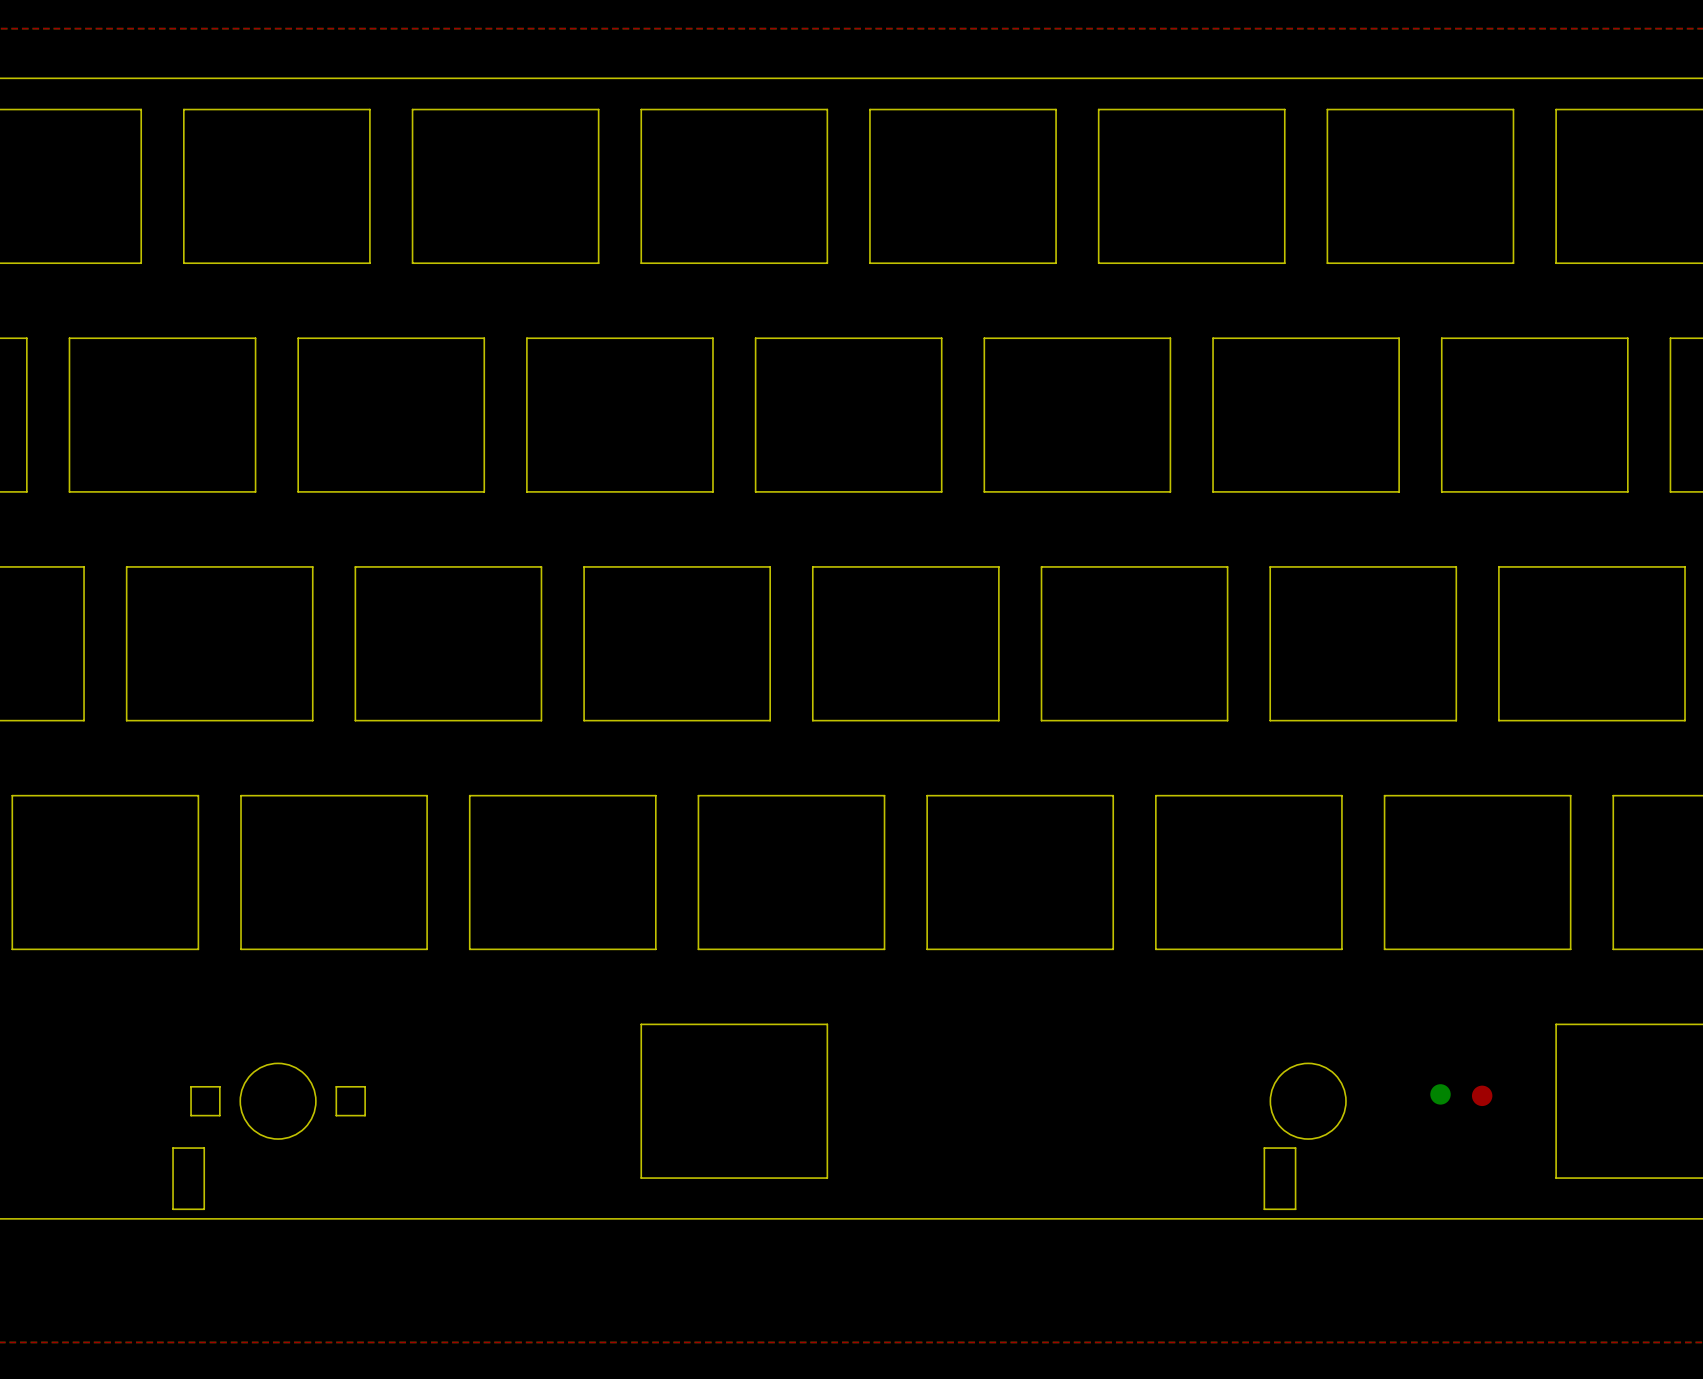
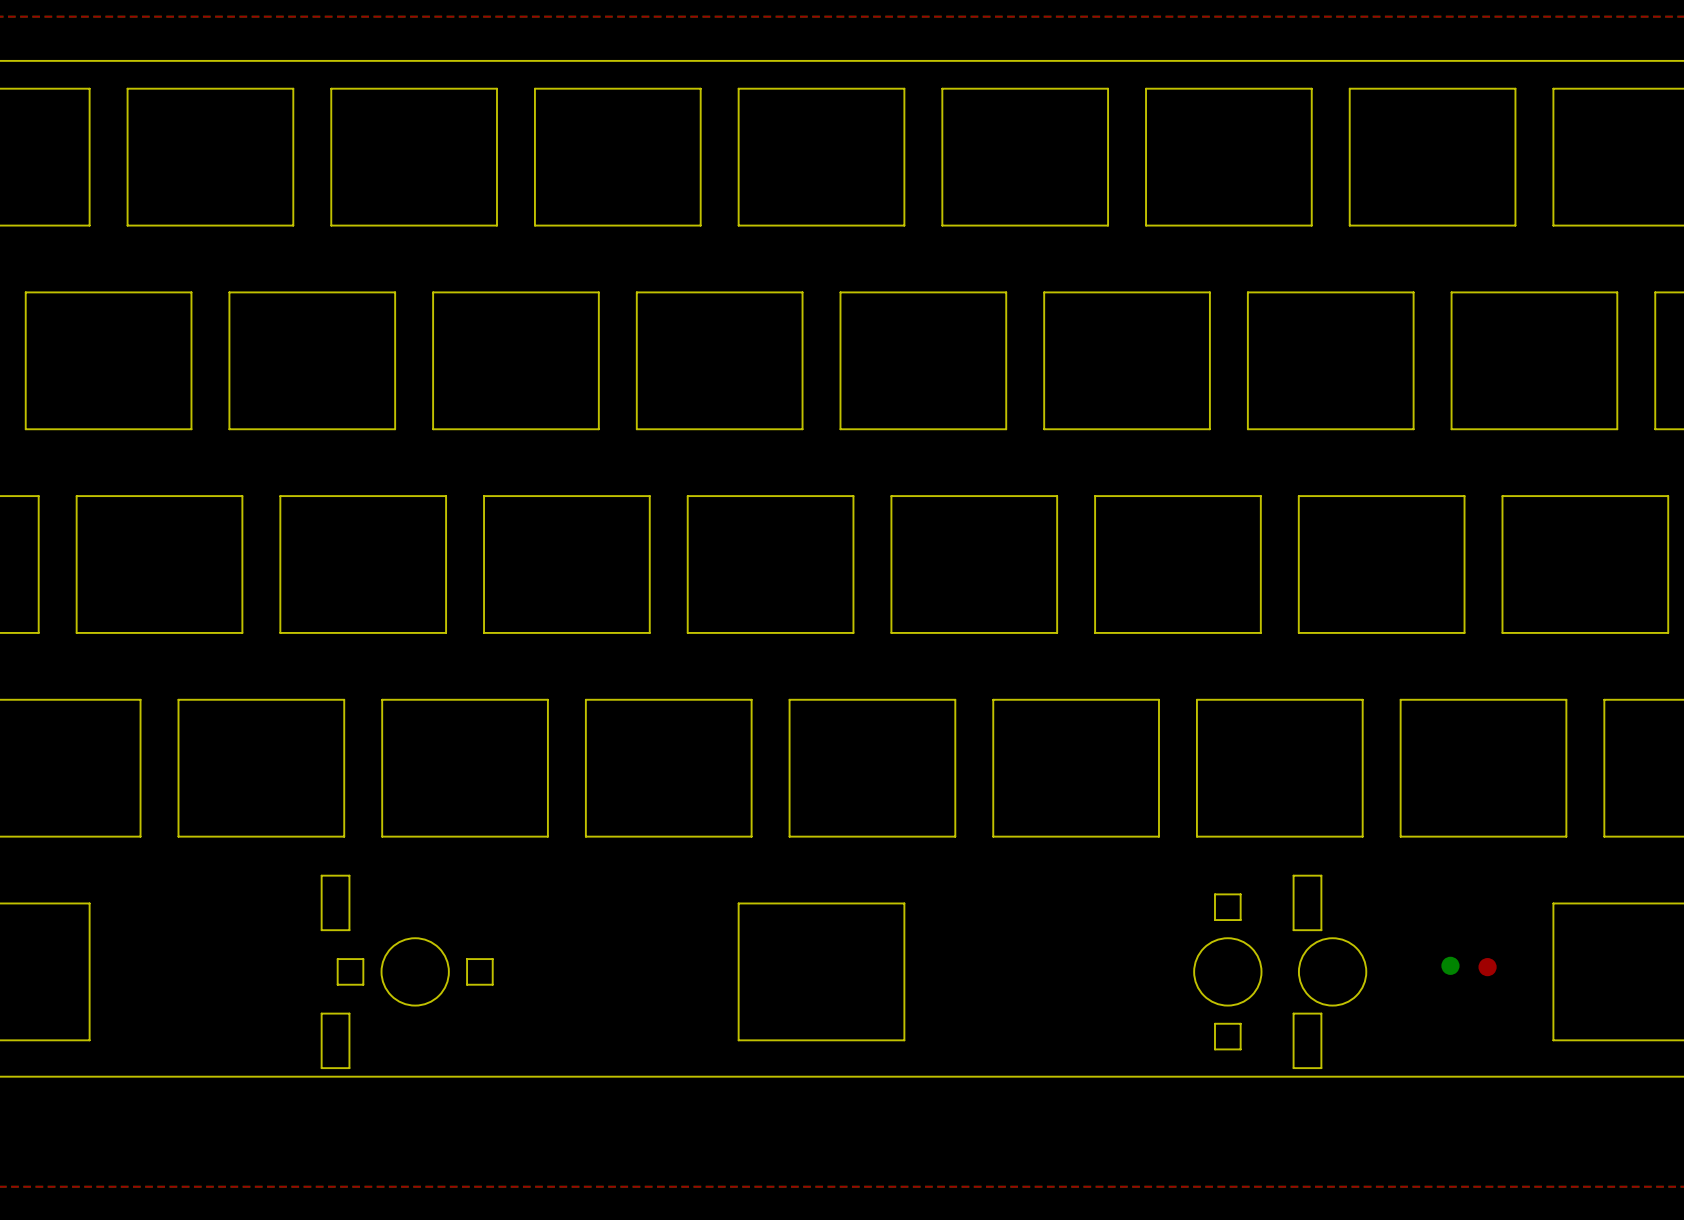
drawing: none -> [321, 875, 1322, 1050]

